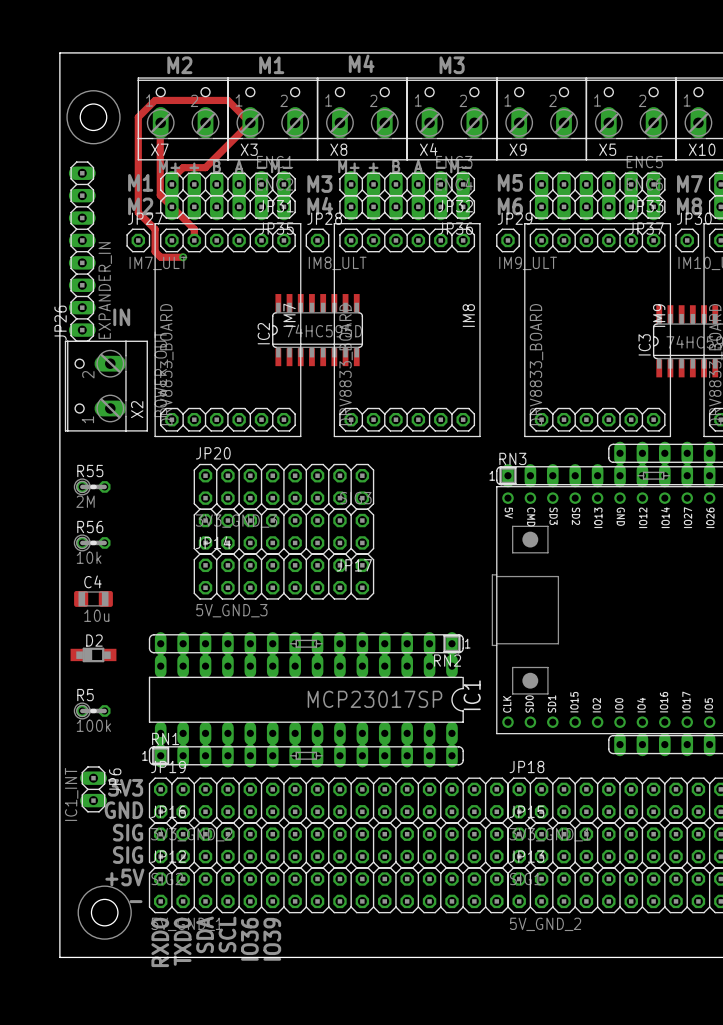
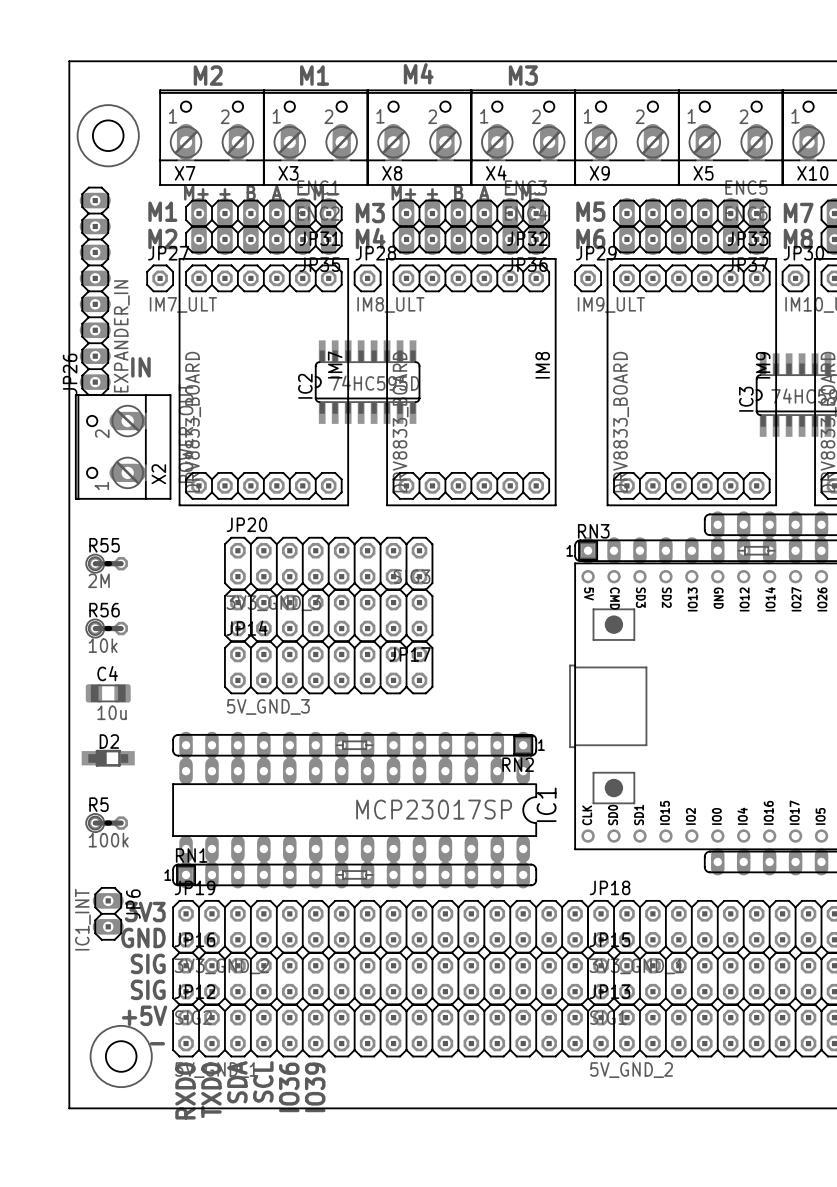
track: (160, 122) (160, 195) (194, 229) (194, 240) -> none
track: (171, 184) (171, 178) (183, 167) (205, 167) (250, 122) (227, 100) (155, 100) (138, 117) (138, 212) (155, 229) (155, 251) (160, 257) (183, 257) -> none
via: (183, 257) -> none

